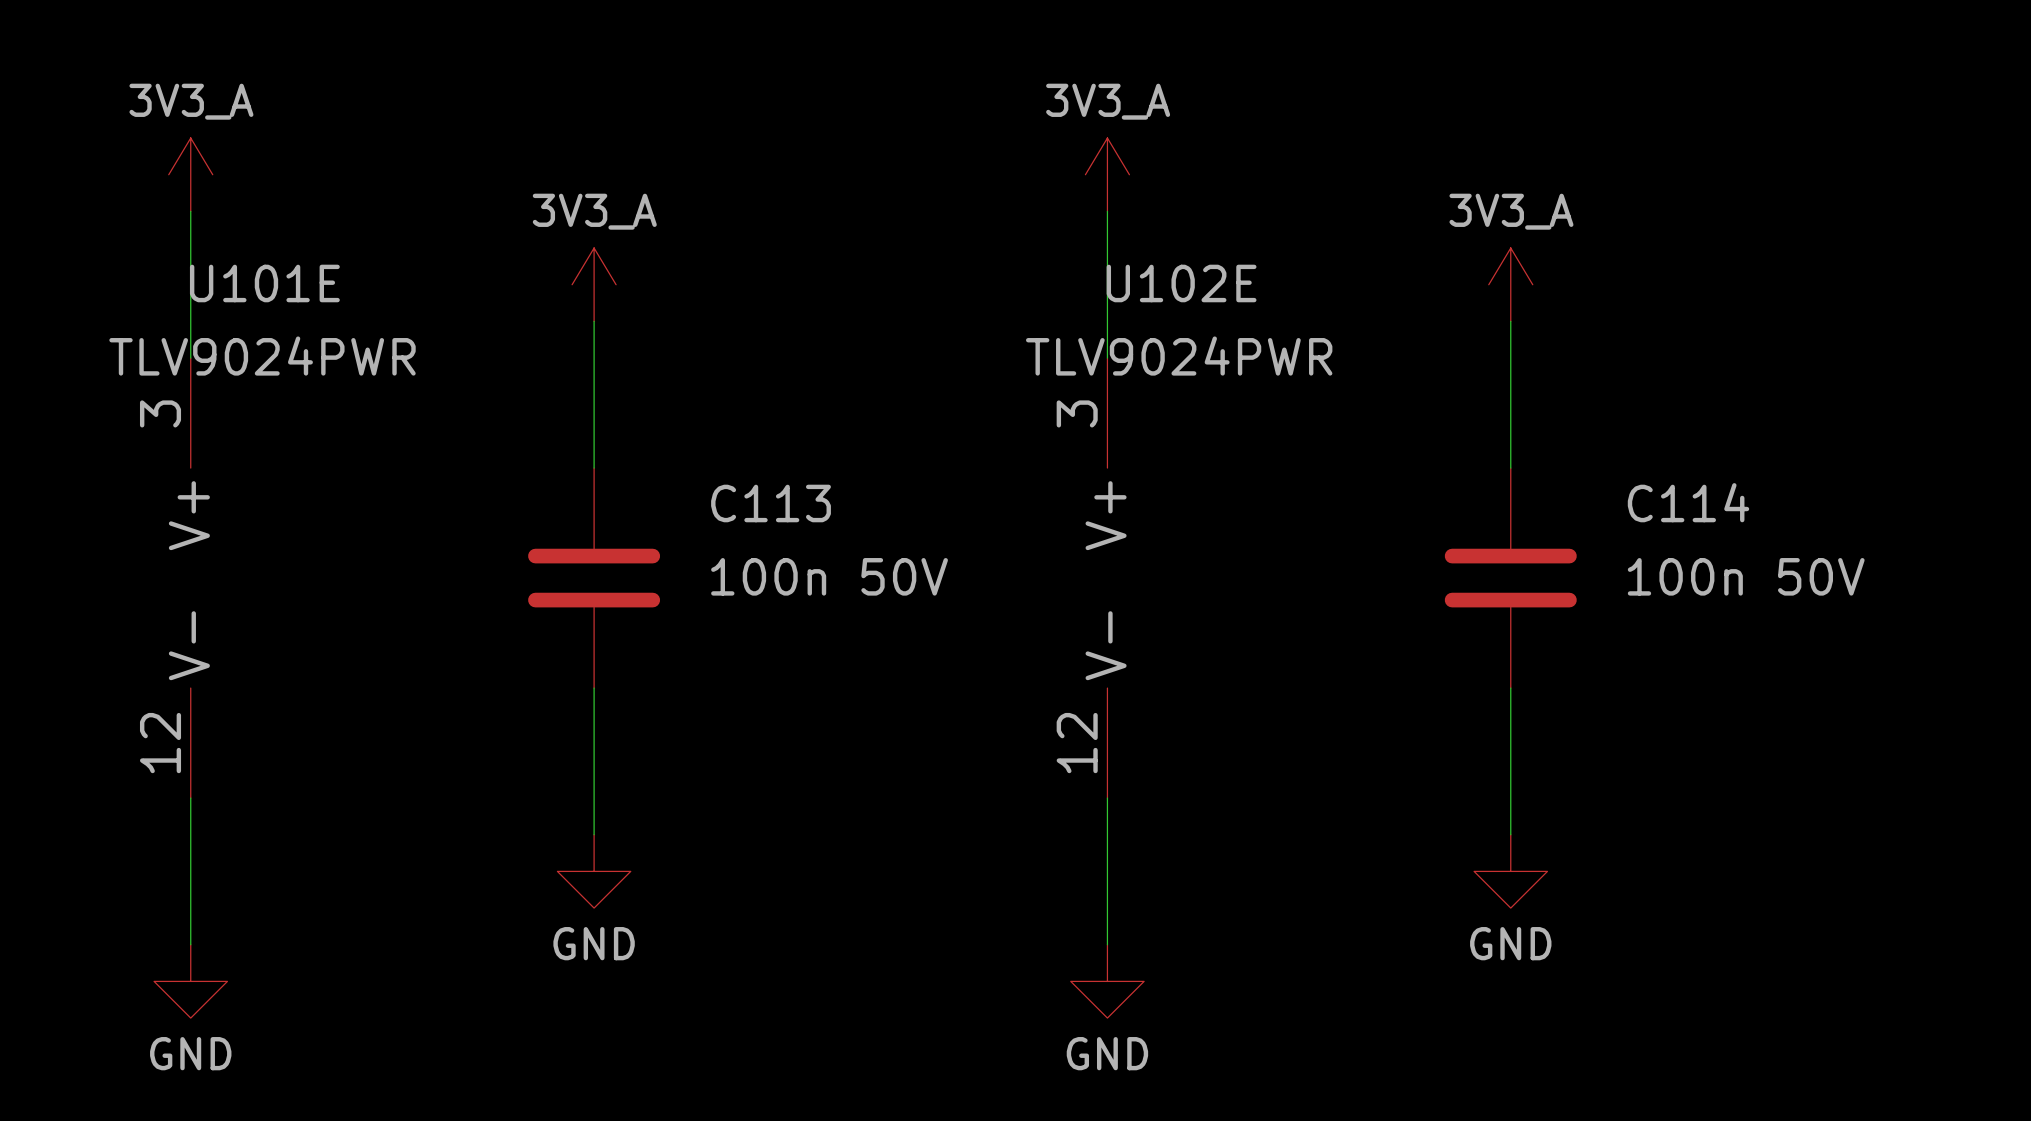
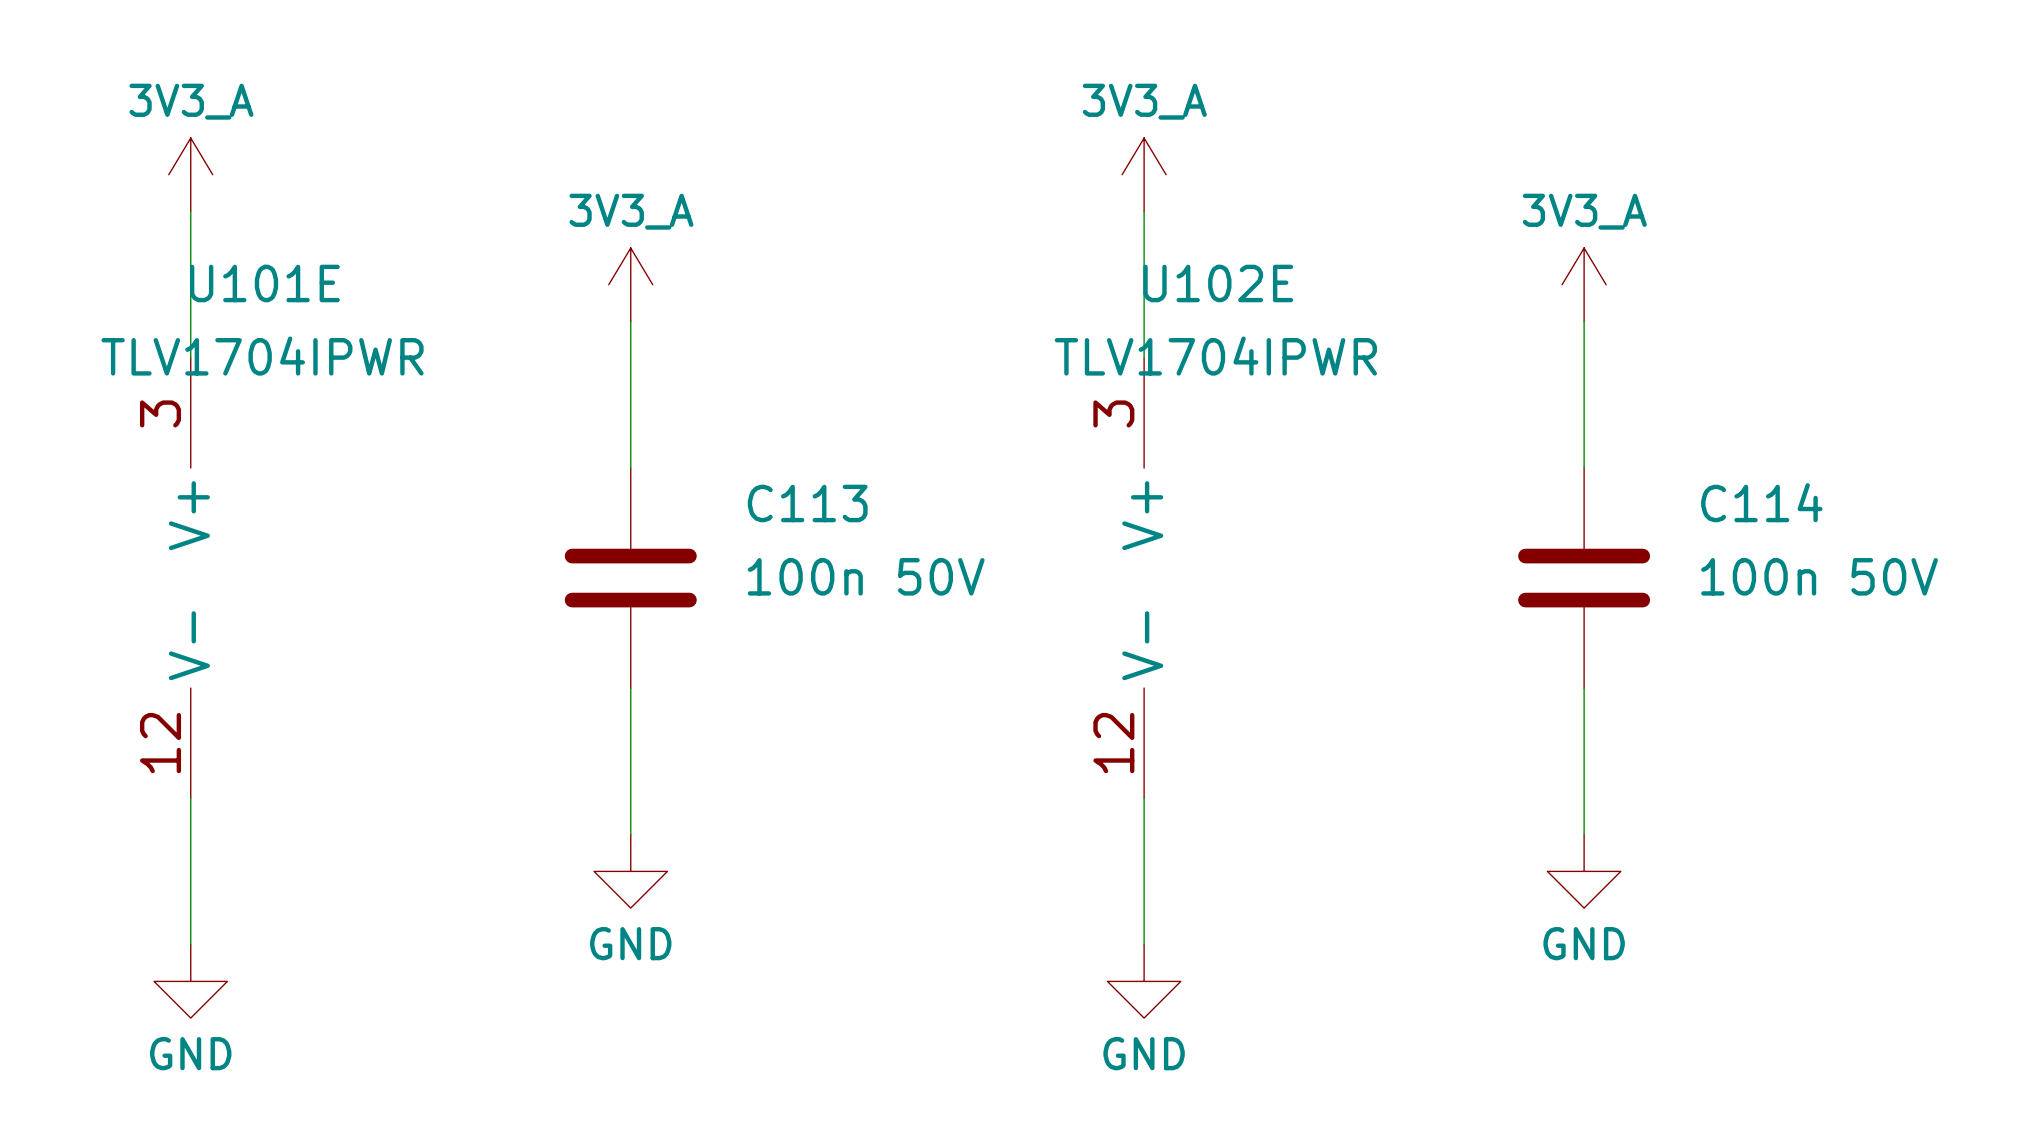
power symbol position: 3V3_A (1107, 174) -> 3V3_A (1144, 174)
wire: (1107, 211) (1107, 358) -> (1144, 211) (1144, 358)
power symbol position: 3V3_A (594, 284) -> 3V3_A (630, 284)
power symbol position: 3V3_A (1510, 284) -> 3V3_A (1584, 284)
wire: (594, 321) (594, 468) -> (630, 321) (630, 468)
wire: (1510, 321) (1510, 468) -> (1584, 321) (1584, 468)
U101E value: TLV9024PWR (262, 356) -> TLV1704IPWR (262, 356)
U102E value: TLV9024PWR (1179, 356) -> TLV1704IPWR (1215, 356)
C113 position: (594, 578) -> (630, 578)
U102E position: (1107, 578) -> (1144, 578)
C114 position: (1510, 578) -> (1584, 578)
wire: (594, 688) (594, 834) -> (630, 688) (630, 834)
wire: (1510, 688) (1510, 834) -> (1584, 688) (1584, 834)
wire: (1107, 798) (1107, 944) -> (1144, 798) (1144, 944)
power symbol position: GND (594, 871) -> GND (630, 871)
power symbol position: GND (1510, 871) -> GND (1584, 871)
power symbol position: GND (1107, 981) -> GND (1144, 981)

